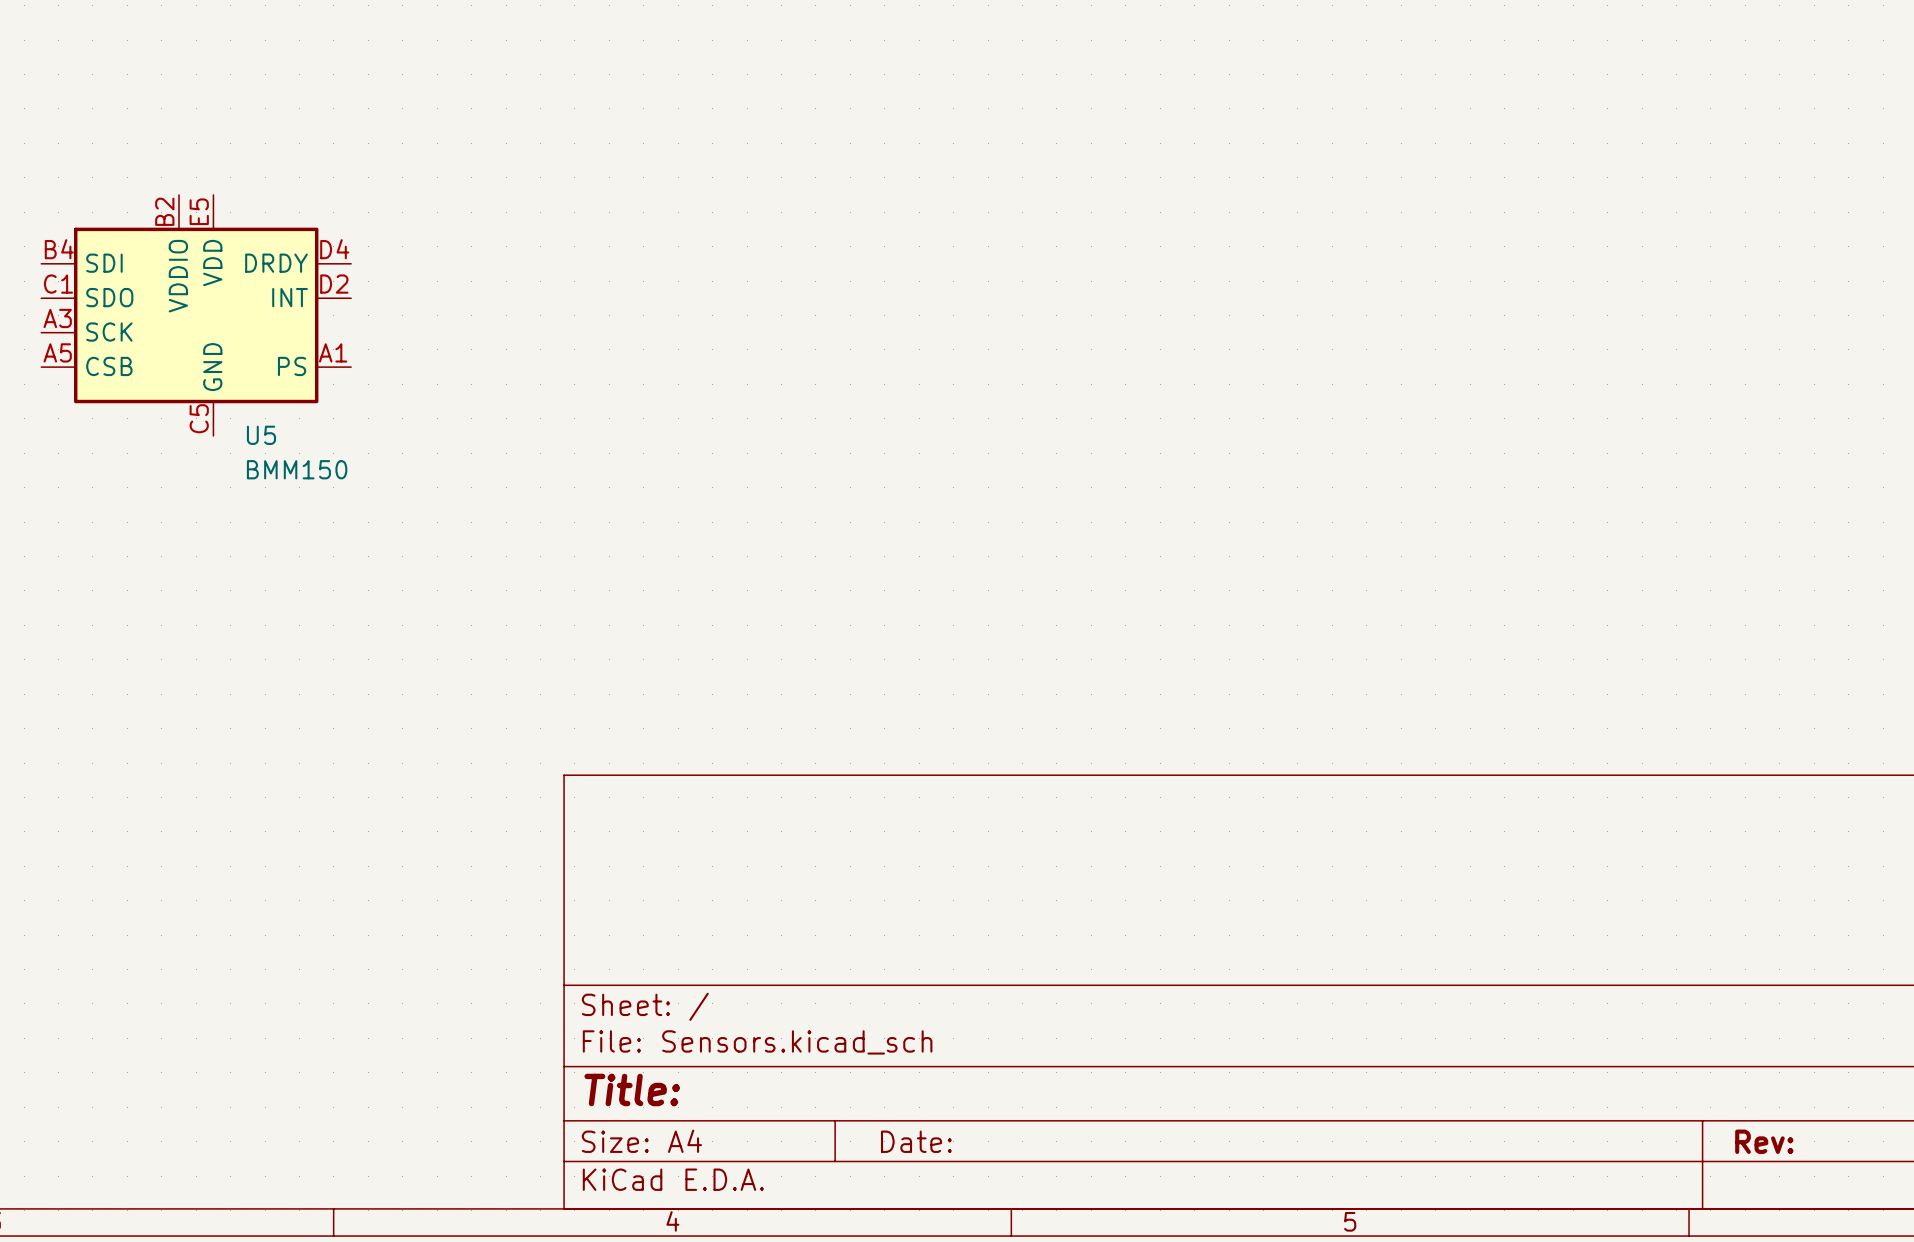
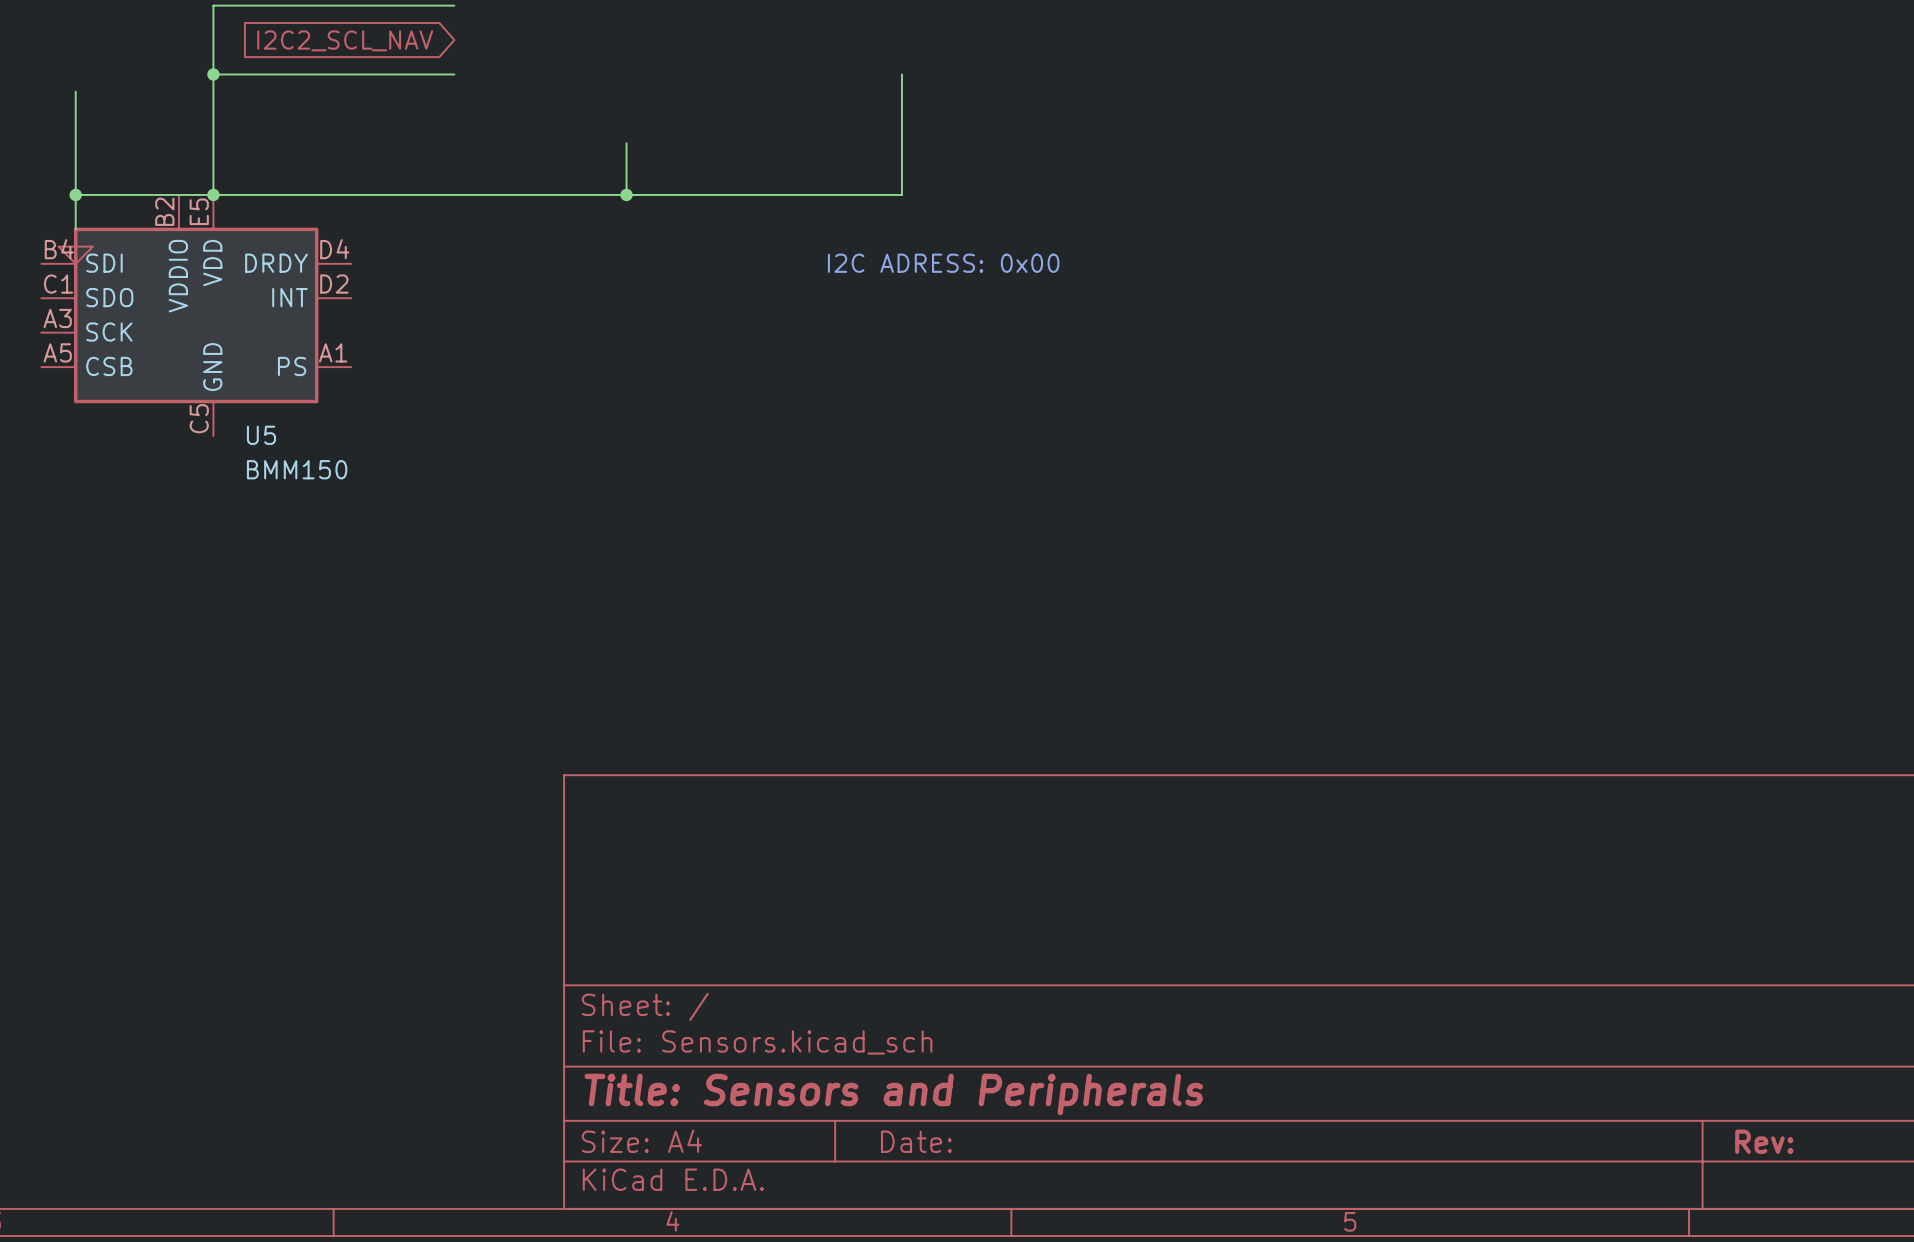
wire: none -> (454, 5) (213, 5) (213, 194)
global label: none -> I2C2_SCL_NAV (345, 40)
wire: none -> (213, 74) (454, 74)
junction: none -> (213, 74)
wire: none -> (901, 74) (901, 194) (75, 194)
wire: none -> (75, 91) (75, 229)
wire: none -> (626, 143) (626, 194)
junction: none -> (75, 194)
junction: none -> (213, 194)
junction: none -> (626, 194)
power symbol: none -> (75, 246)
text: none -> I2C ADRESS: 0x00 (943, 263)
title block: Title: (632, 1089) -> Title: Sensors and Peripherals (893, 1094)

